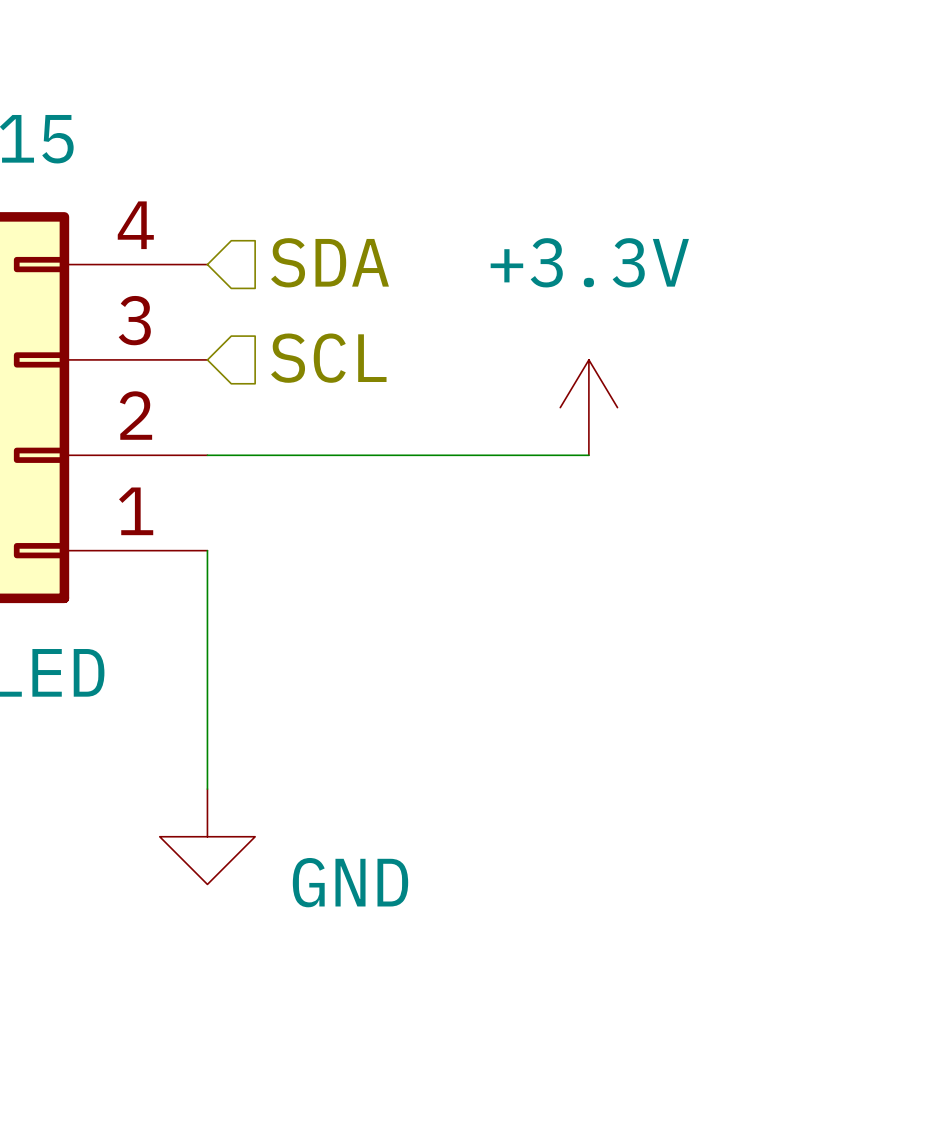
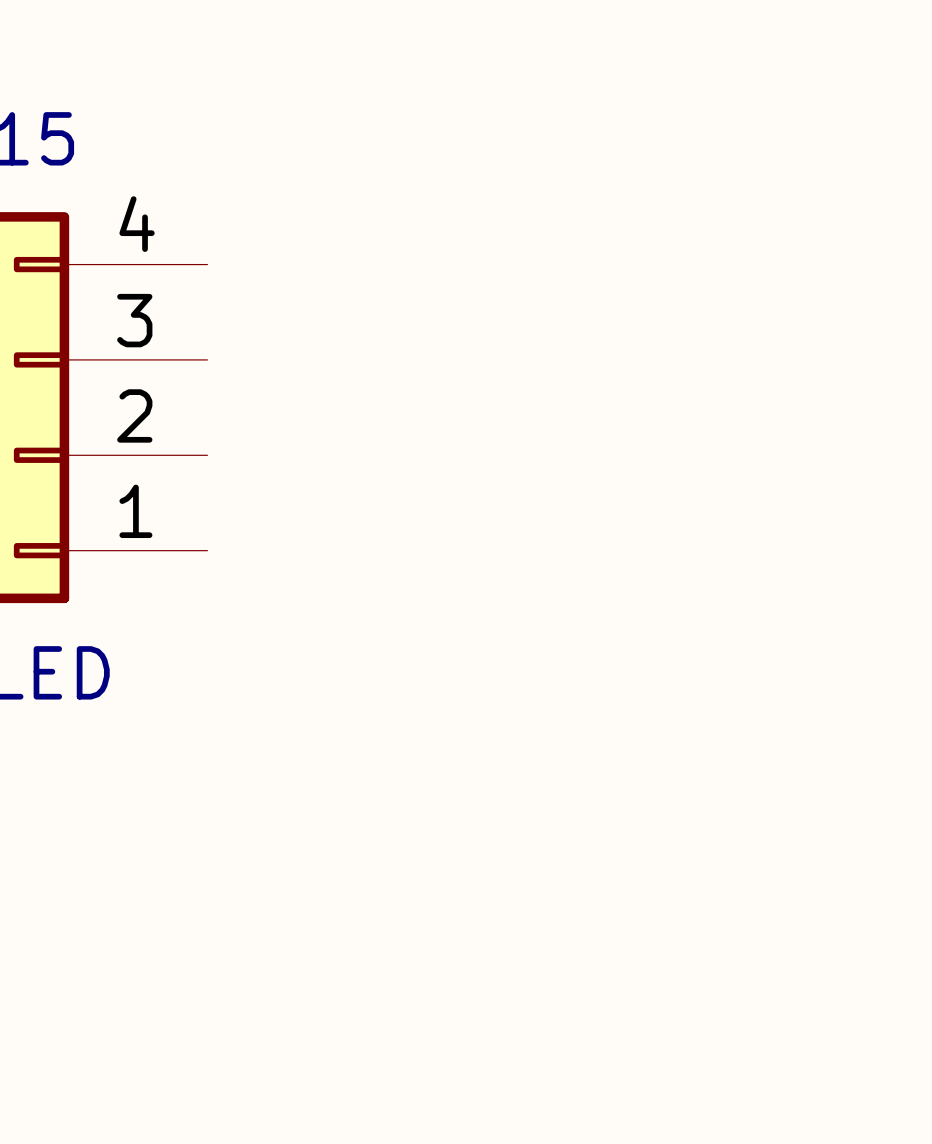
hierarchical label: SDA (330, 262) -> none
hierarchical label: SCL (328, 358) -> none
power symbol: +3.3V (588, 407) -> none
wire: (207, 455) (588, 455) -> none
wire: (207, 550) (207, 789) -> none
power symbol: GND (207, 836) -> none

